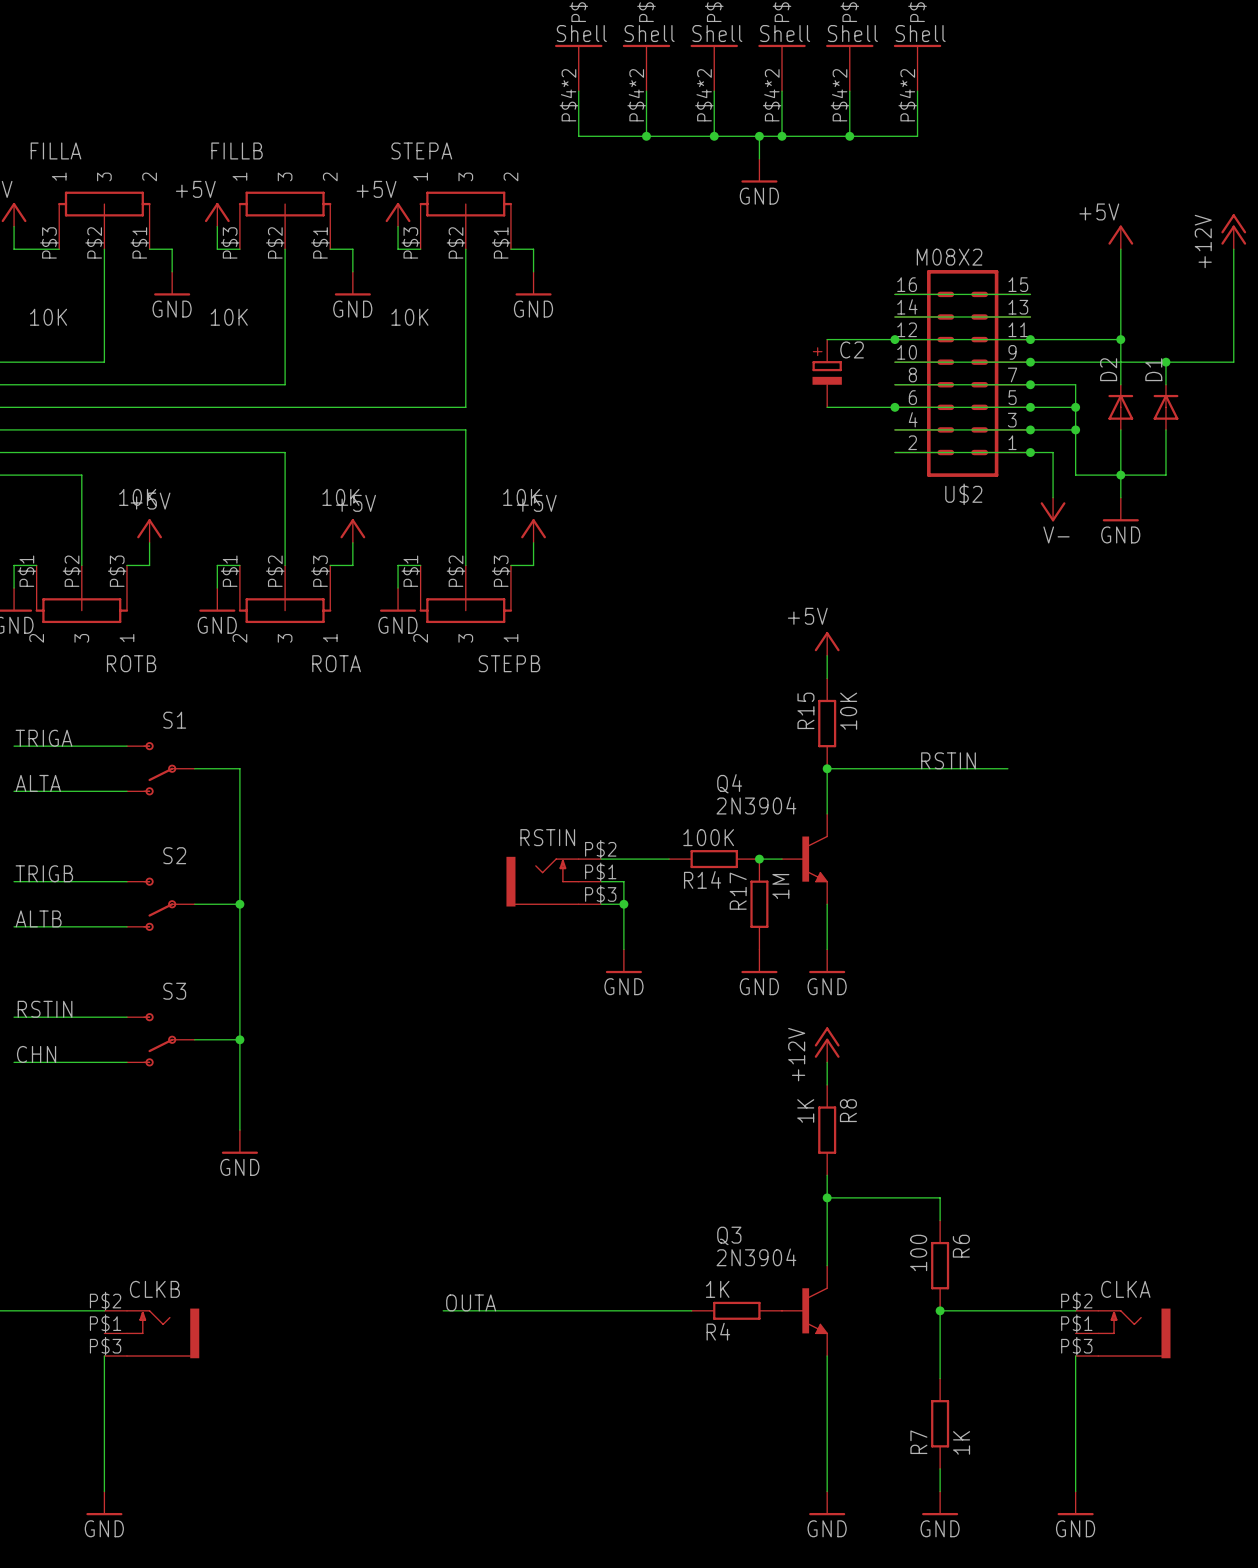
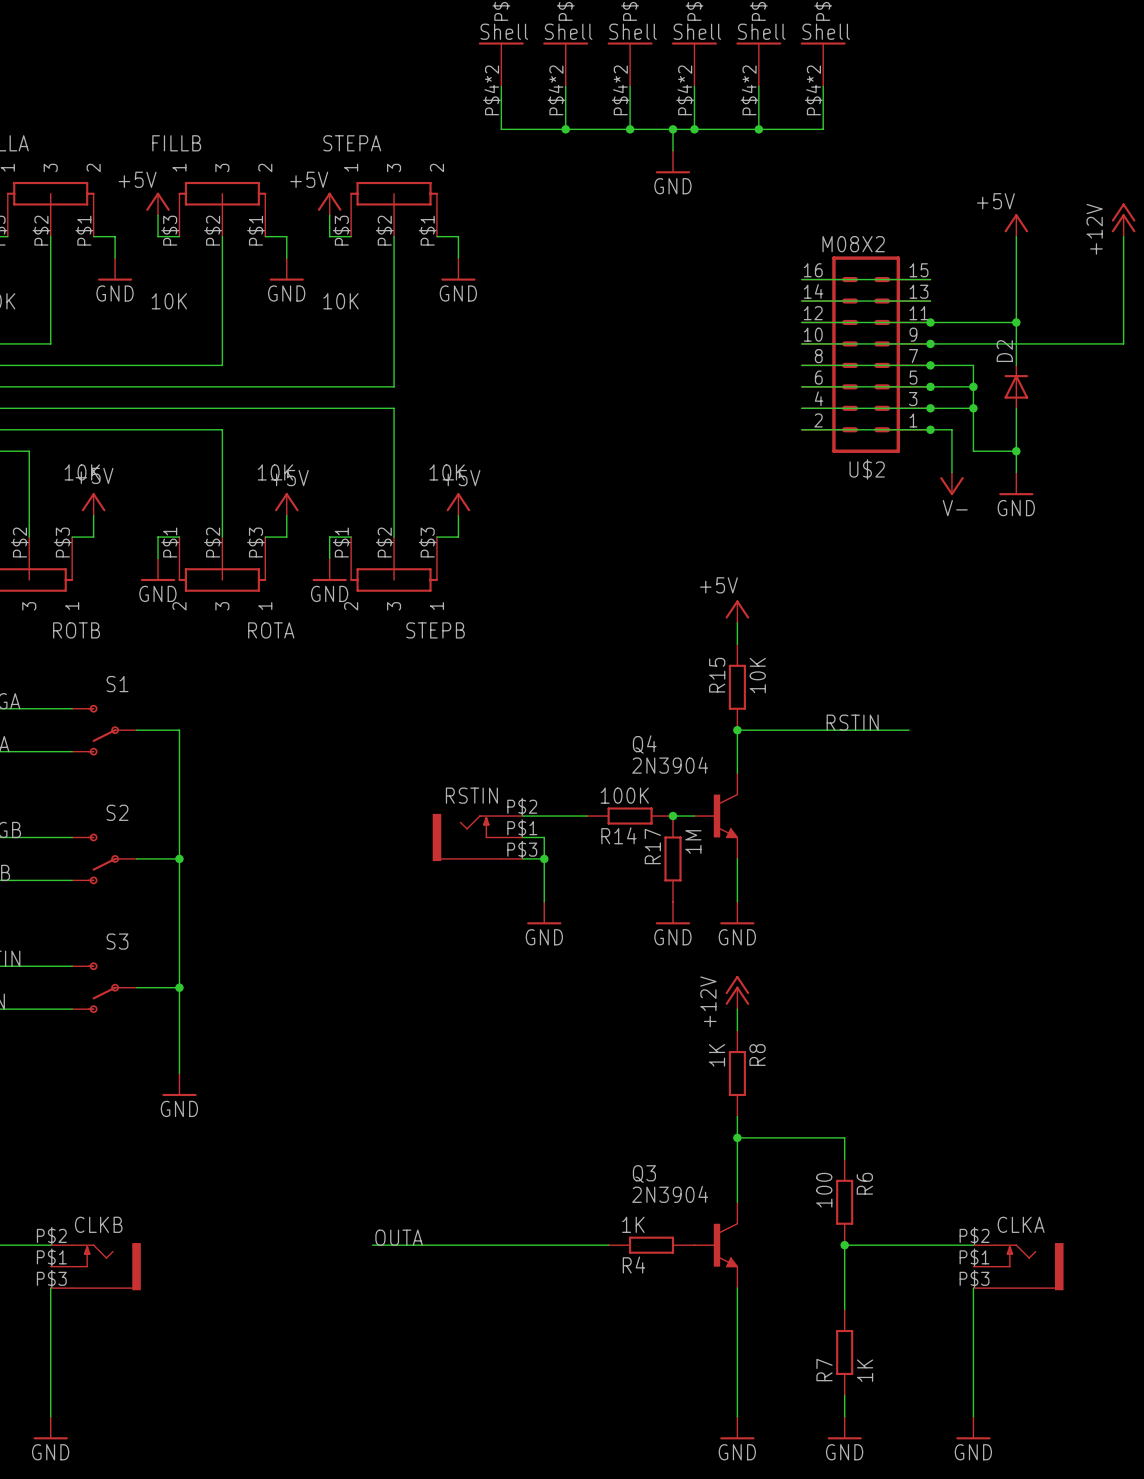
wire: (827, 339) (894, 339) -> none
junction: (894, 339) -> none
wire: (1165, 362) (1165, 384) -> none
junction: (1165, 362) -> none
C2: (827, 373) -> none
wire: (827, 407) (894, 407) -> none
junction: (894, 407) -> none
D1: (1165, 407) -> none
wire: (1165, 429) (1165, 475) (1120, 475) -> none

